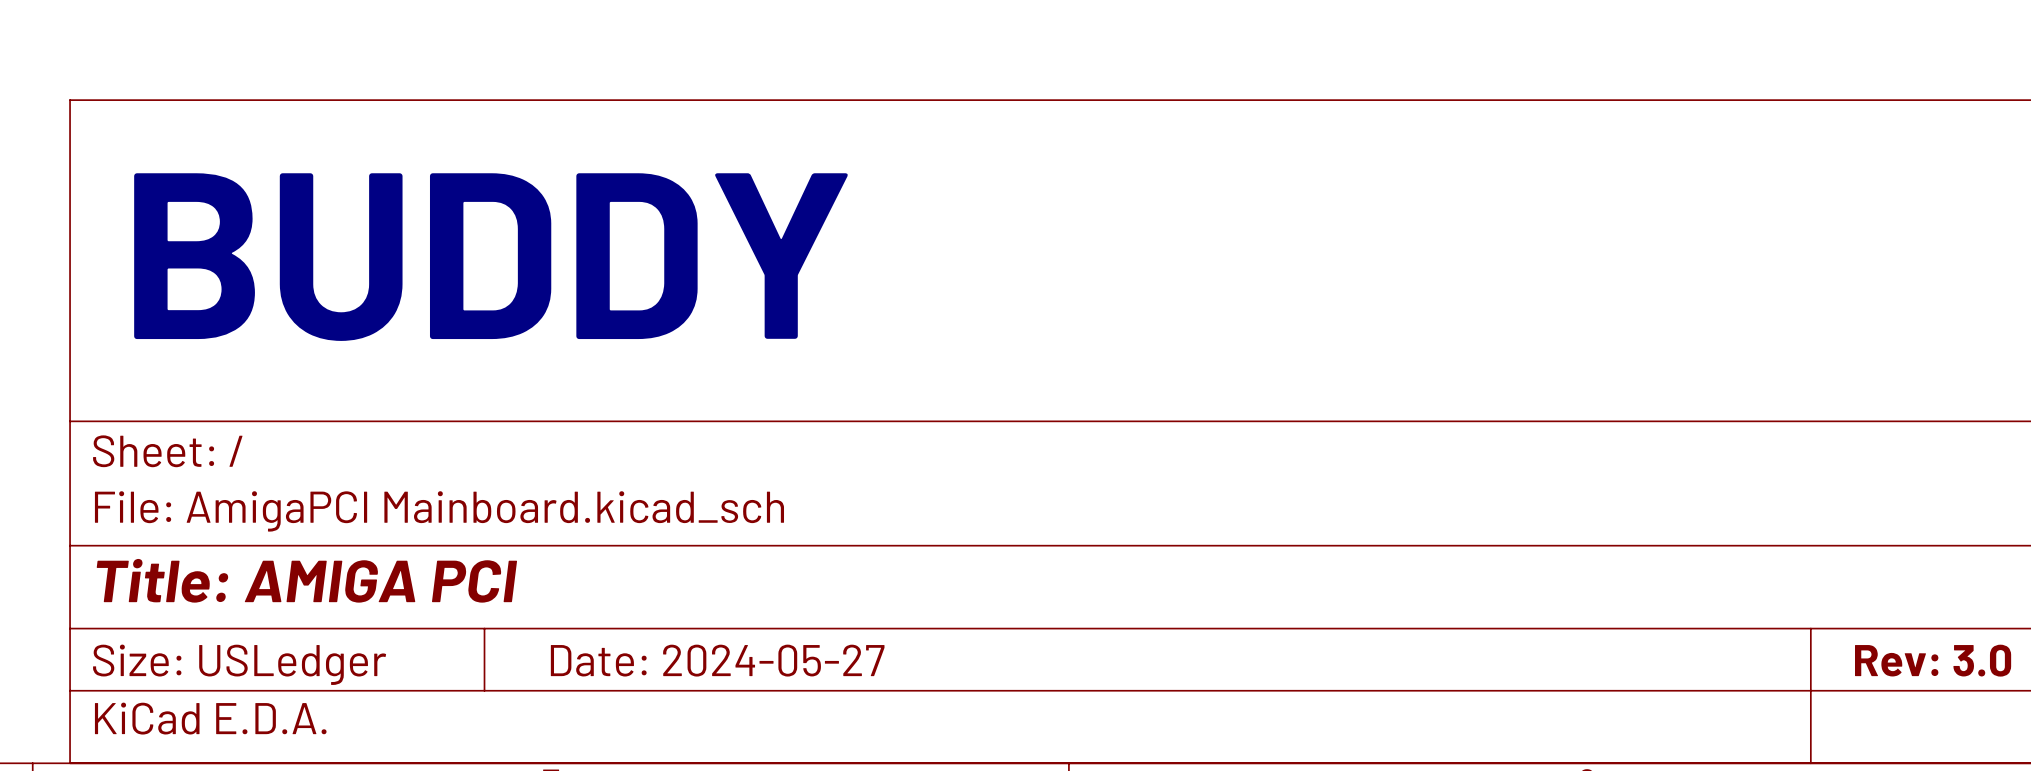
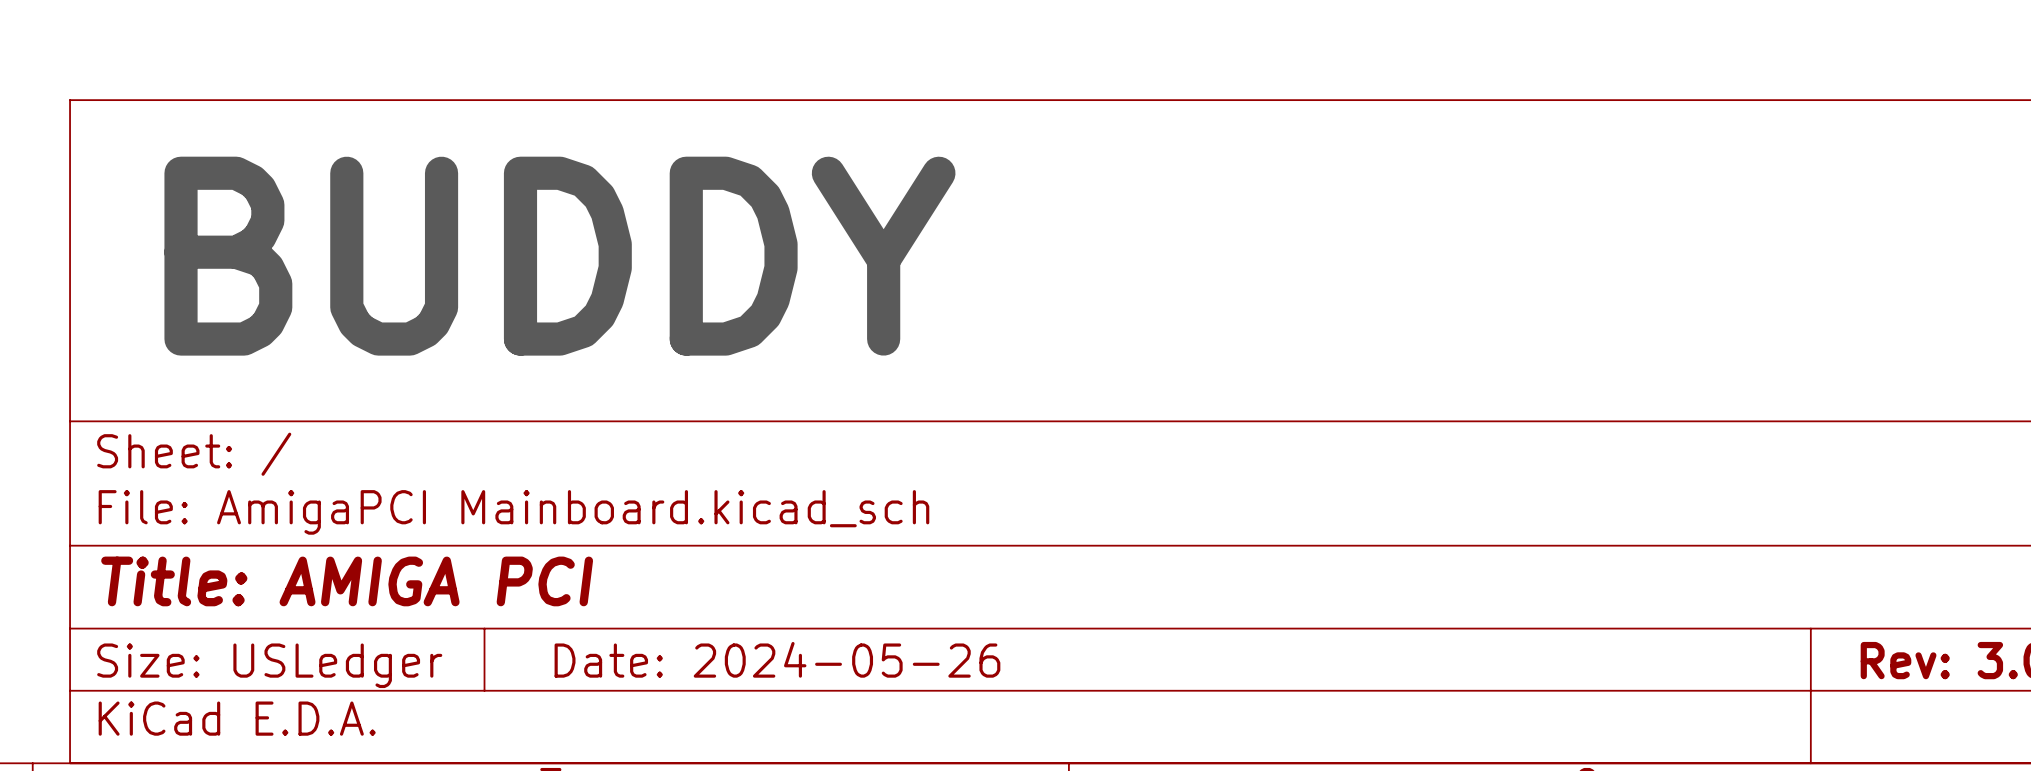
title block: Date: 2024-05-27 (717, 660) -> Date: 2024-05-26 (777, 659)

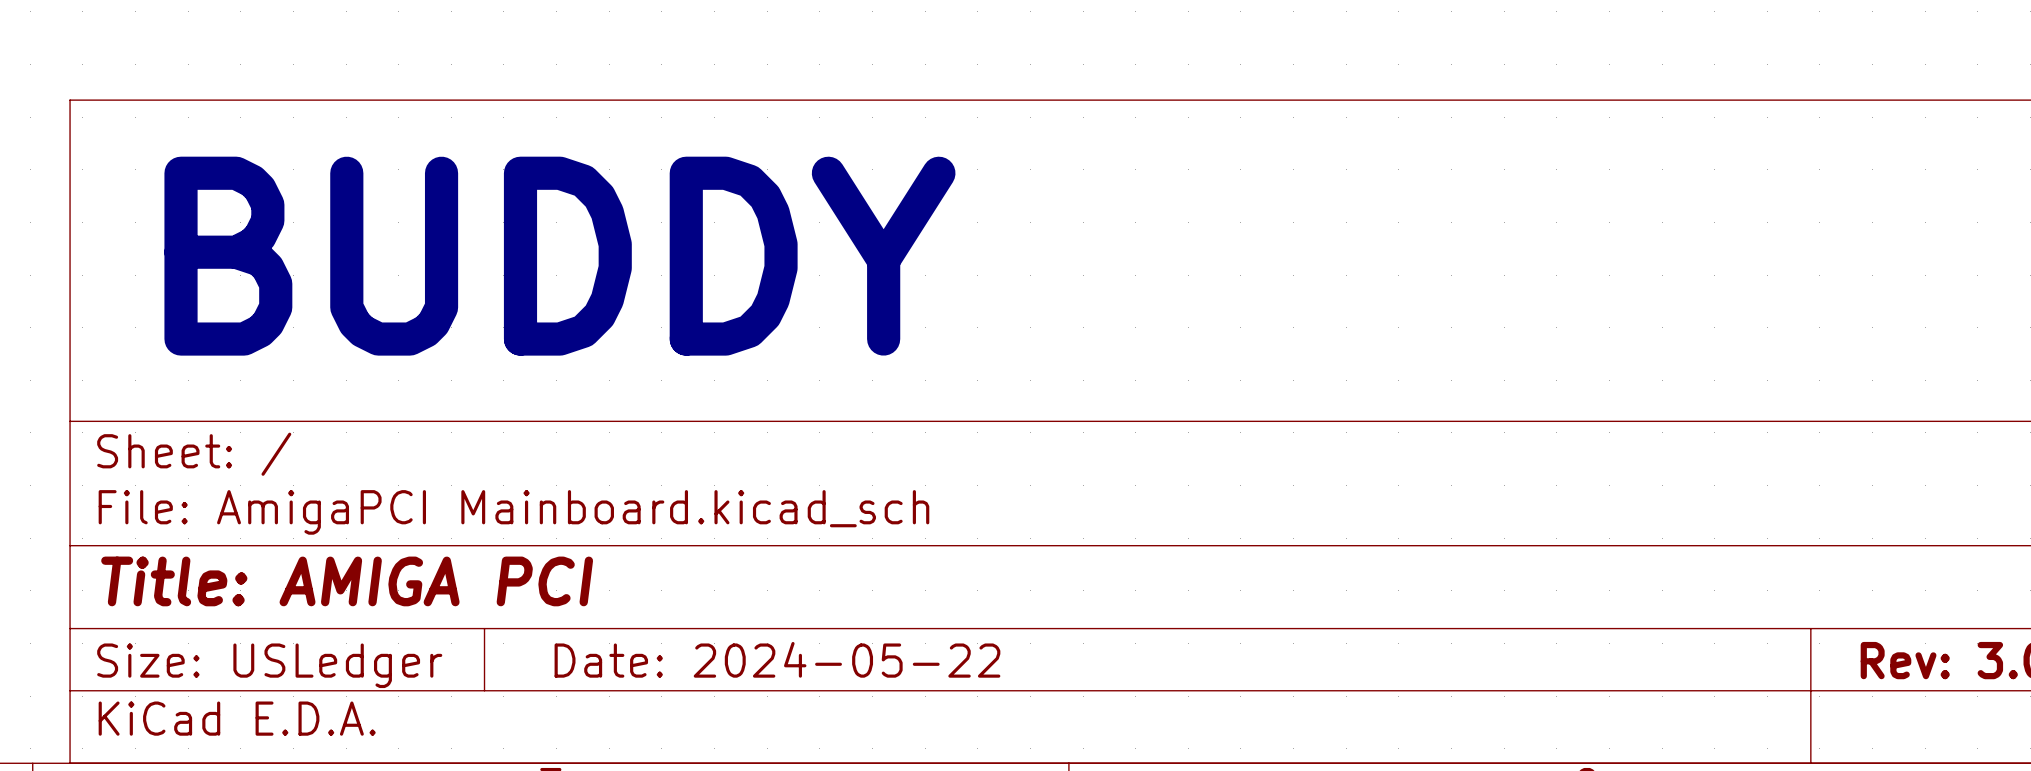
title block: Date: 2024-05-26 (777, 659) -> Date: 2024-05-22 (777, 659)

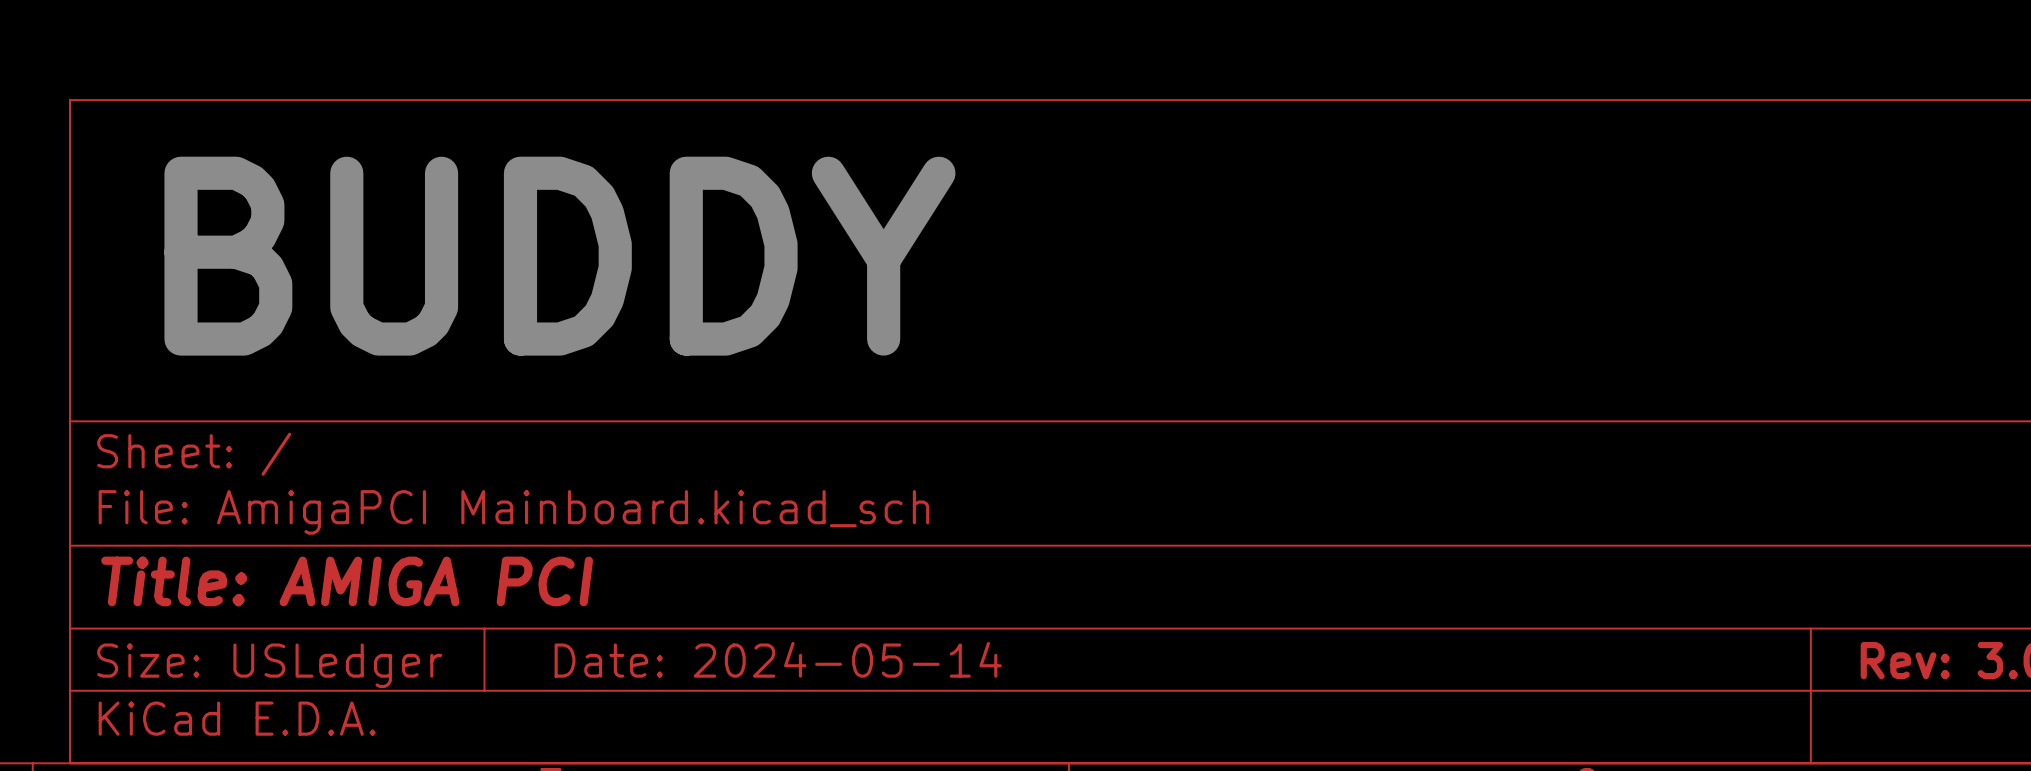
title block: Date: 2024-05-22 (777, 659) -> Date: 2024-05-14 (778, 659)

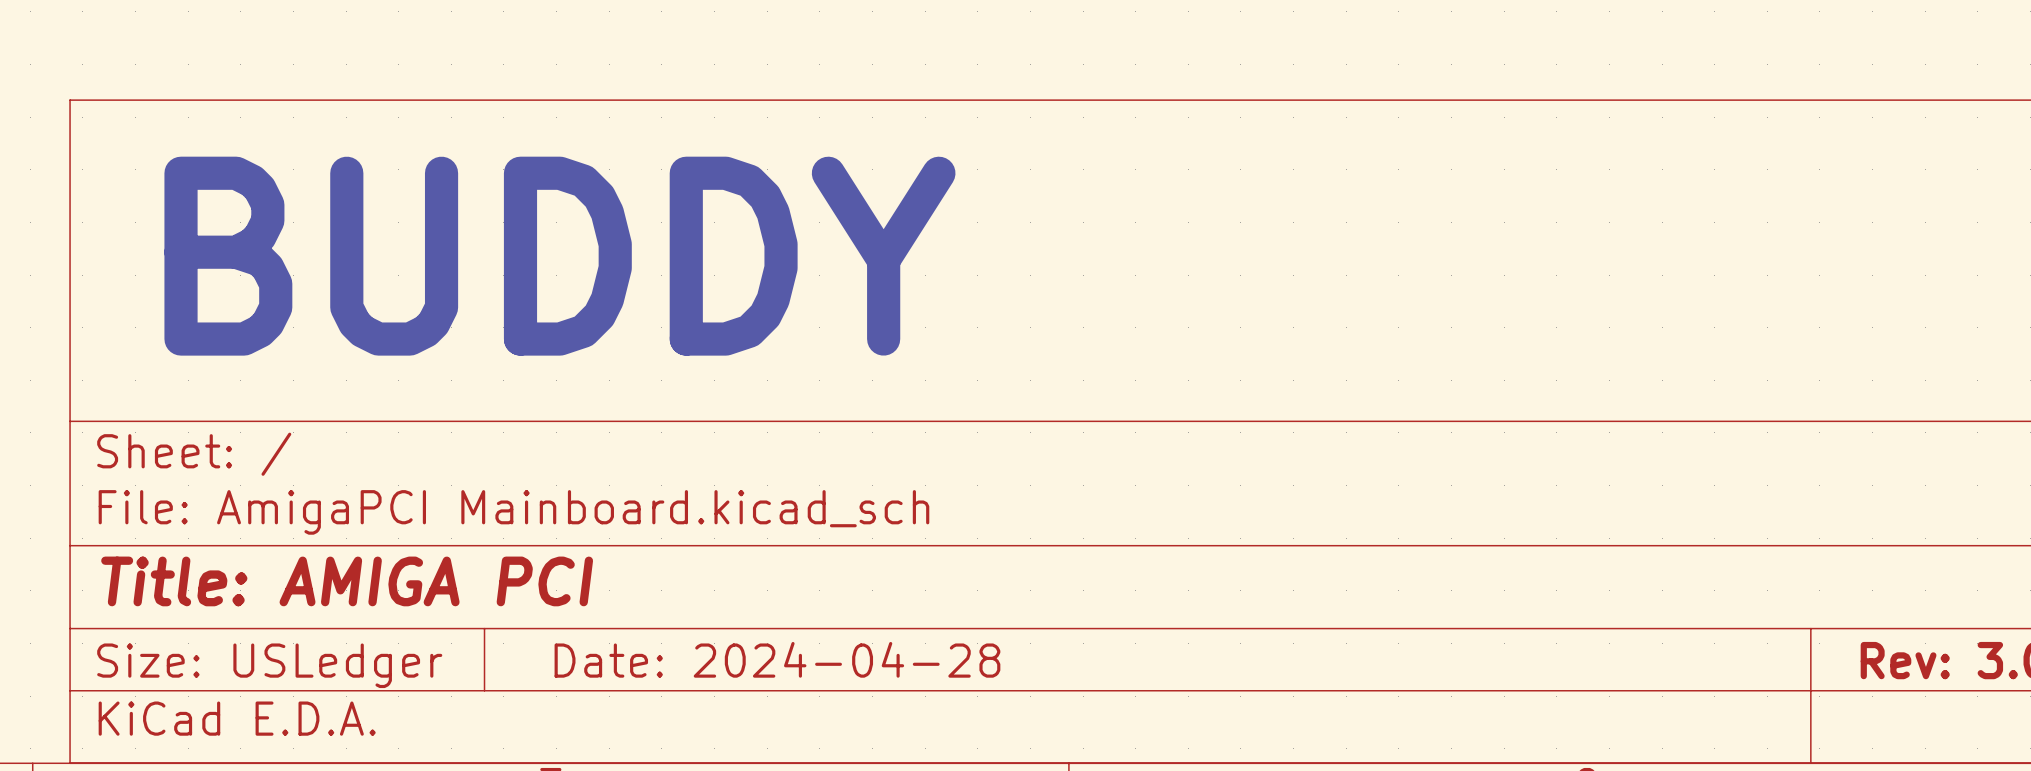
title block: Date: 2024-05-14 (778, 659) -> Date: 2024-04-28 (777, 659)

